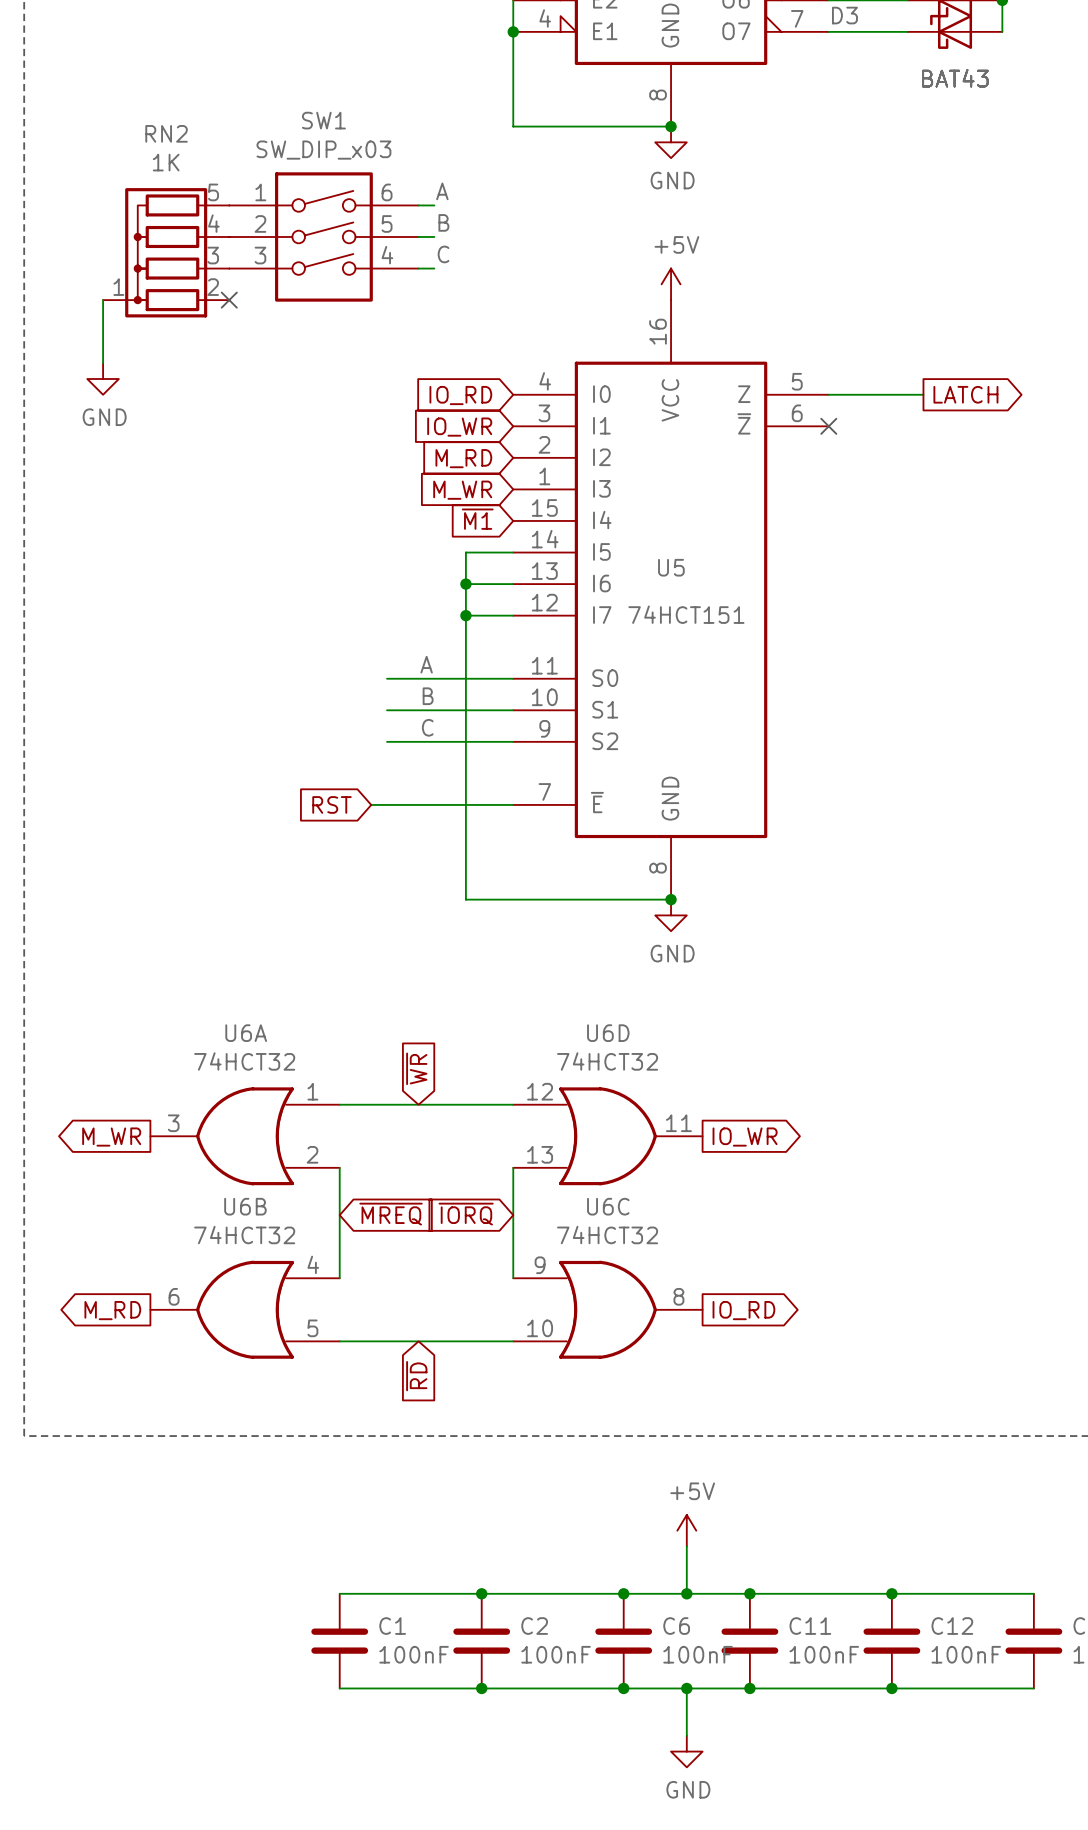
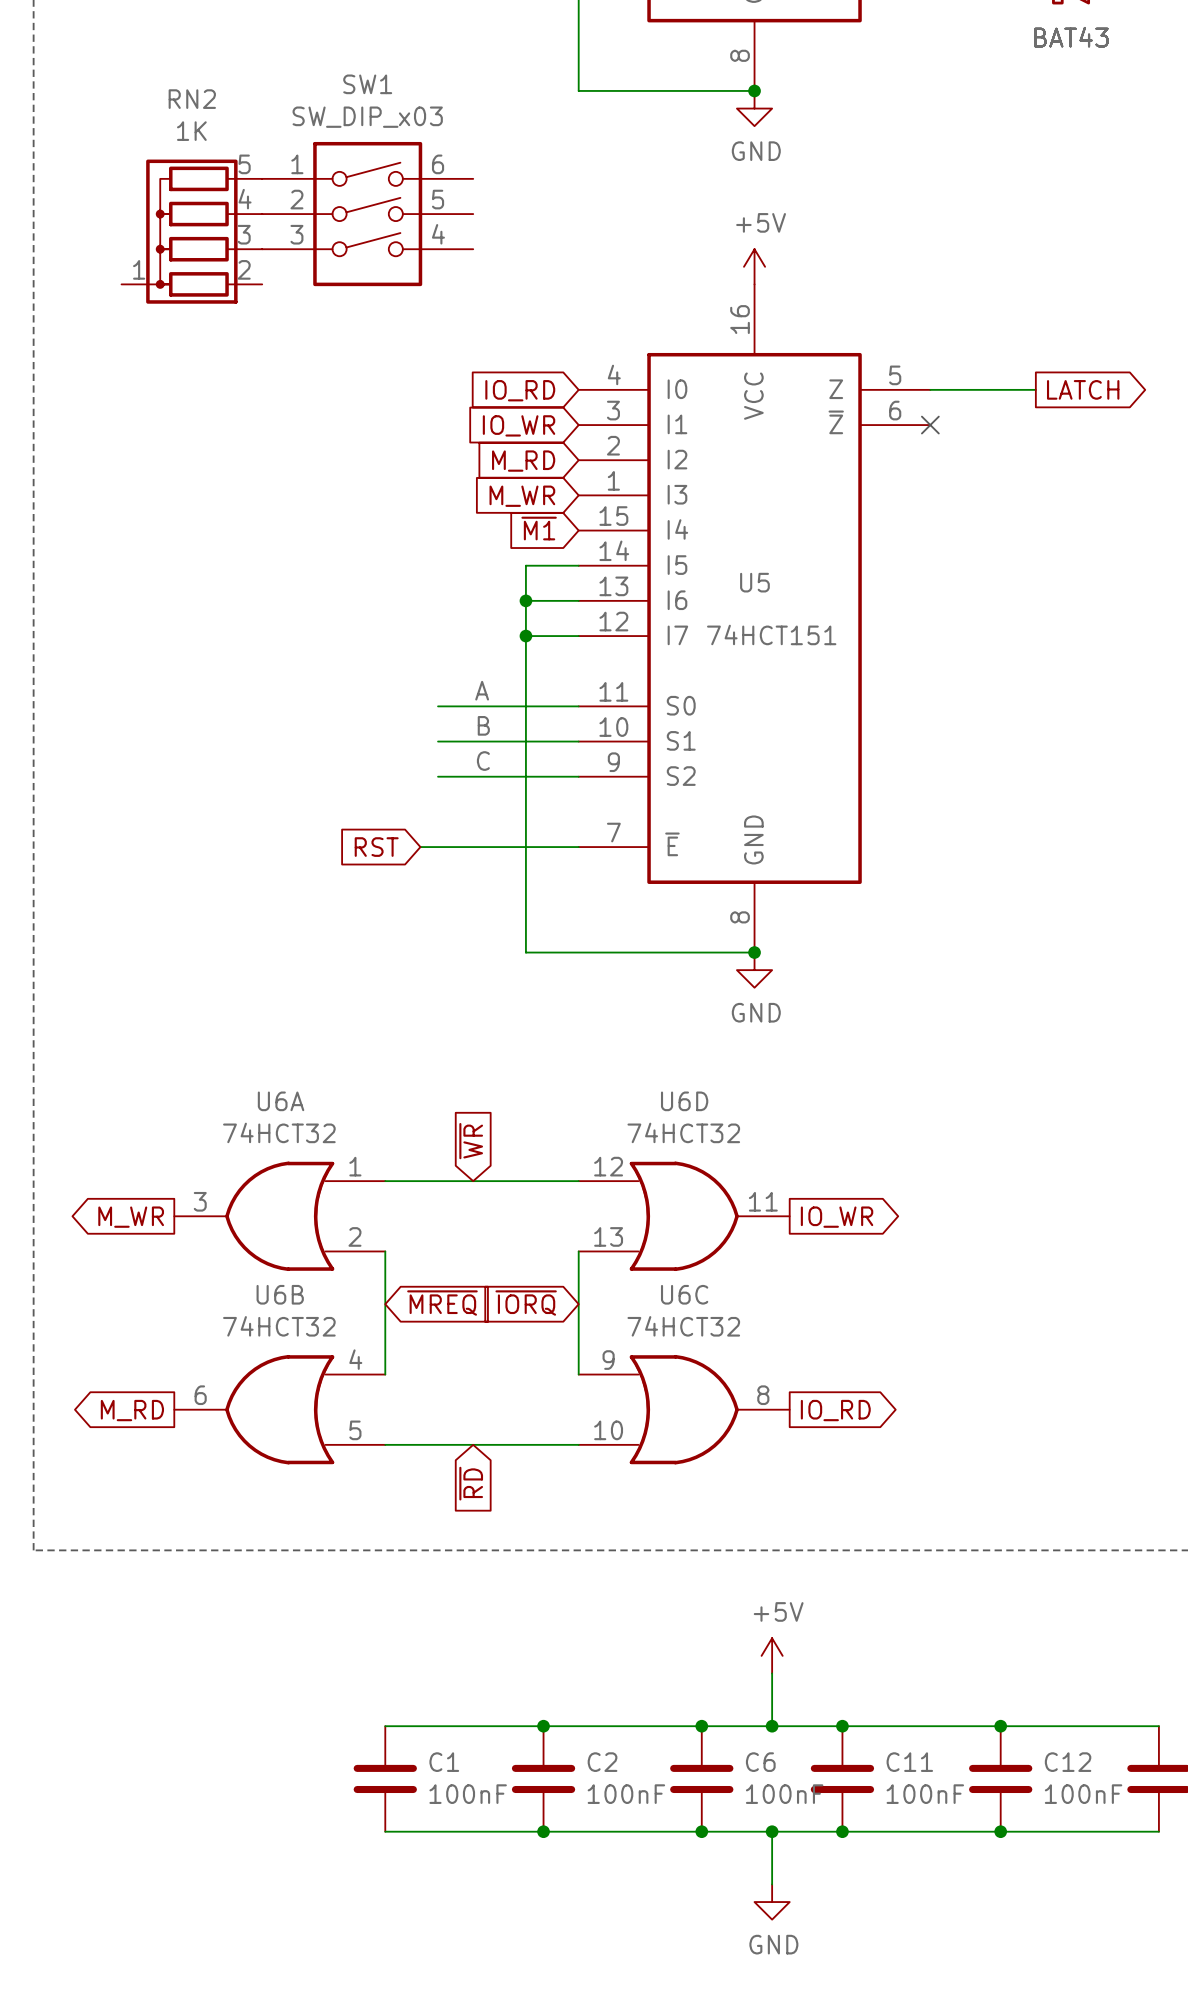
label: A (442, 191) -> none
wire: (418, 205) (434, 205) -> none
label: B (443, 222) -> none
wire: (418, 237) (434, 237) -> none
label: C (443, 254) -> none
wire: (418, 268) (434, 268) -> none
wire: (103, 300) (103, 363) -> none
no-connect mark: (229, 300) -> none
power symbol: GND (103, 378) -> none

